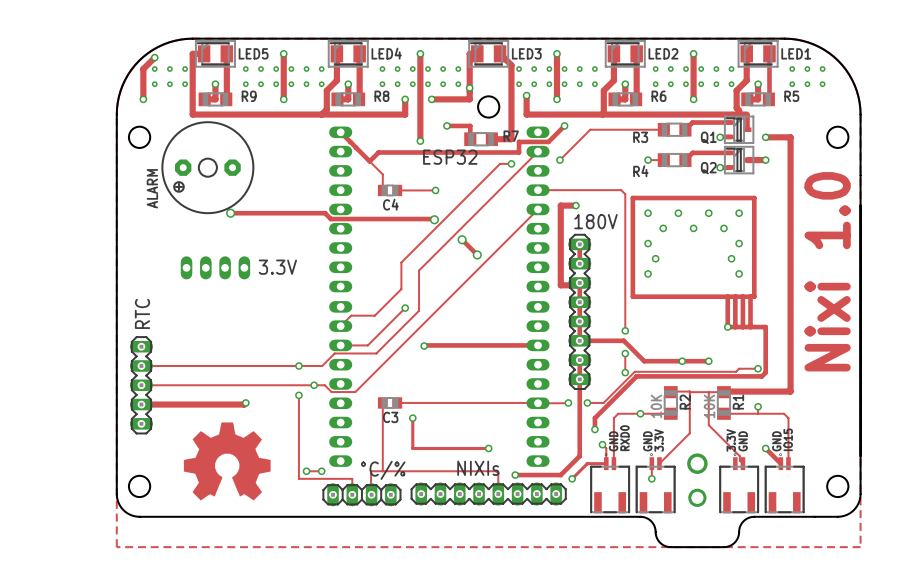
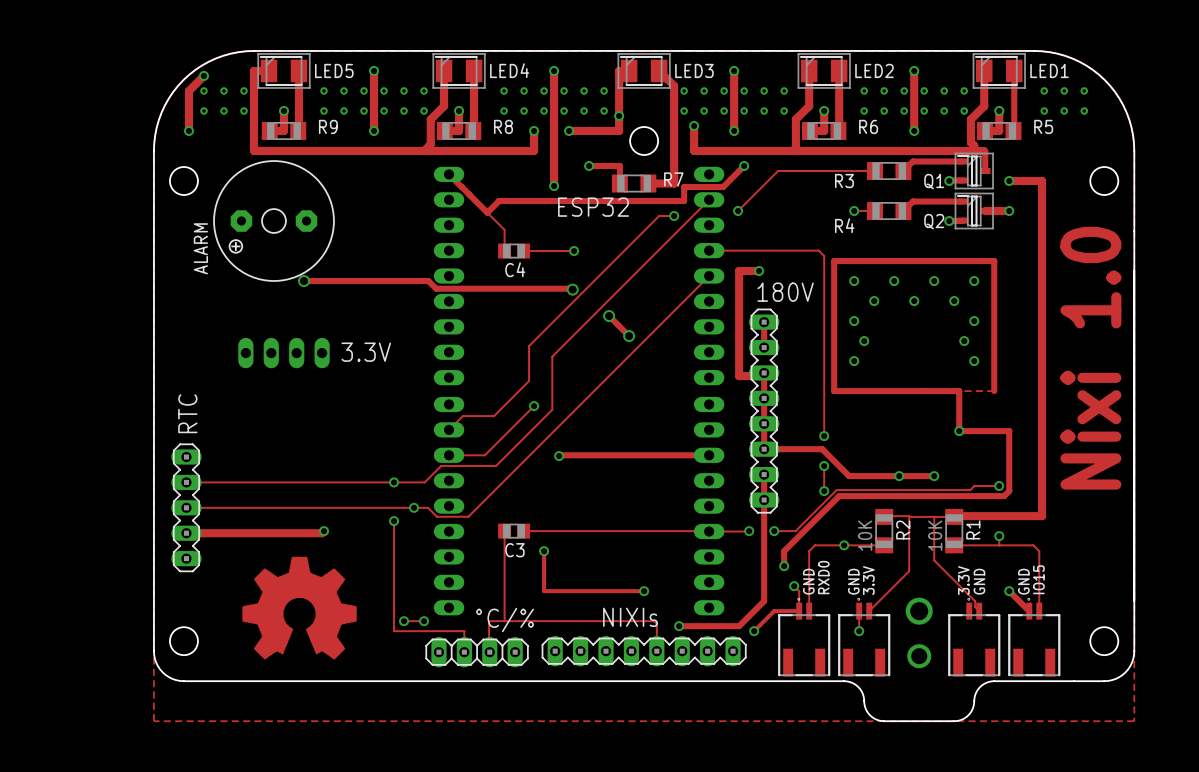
track: (727, 296) (754, 296) -> none
track: (735, 296) (735, 327) -> none
track: (742, 296) (742, 327) -> none
track: (750, 296) (750, 327) -> none

